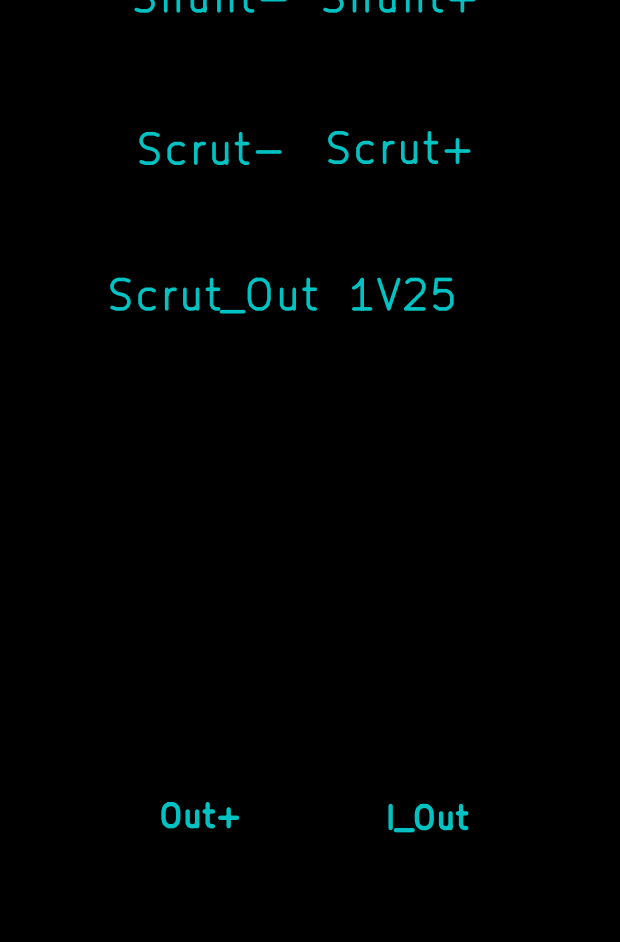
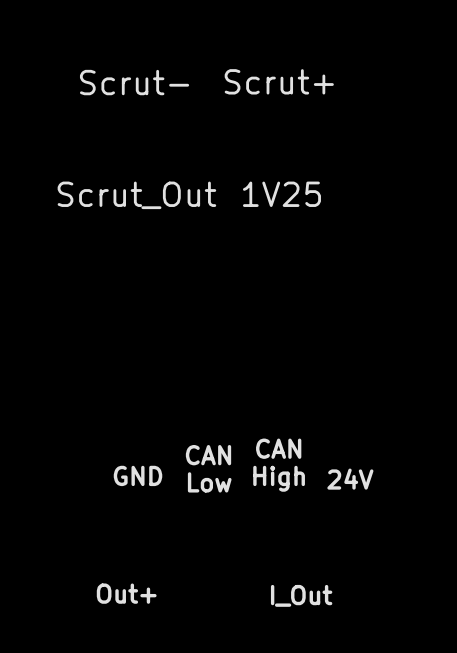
text: none -> CAN (278, 448)
text: none -> CAN (208, 455)
text: none -> GND (138, 475)
text: none -> High (279, 478)
text: none -> 24V (350, 479)
text: none -> Low (209, 482)

